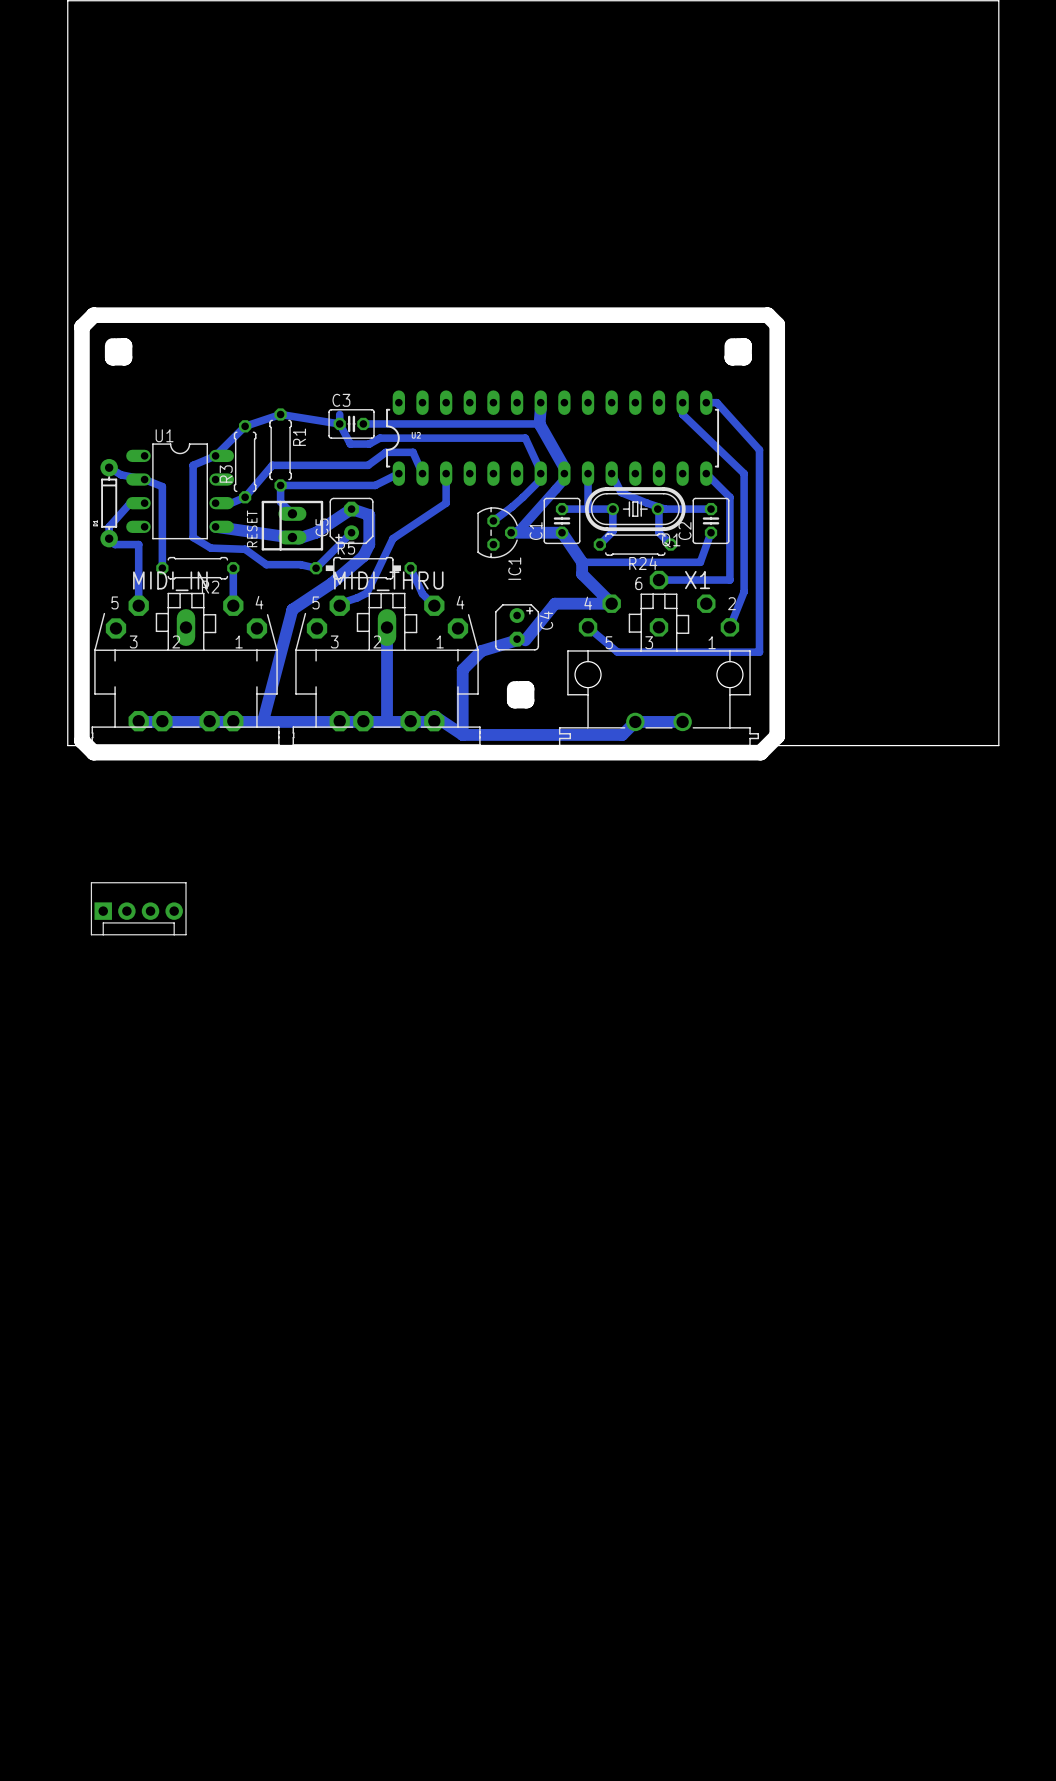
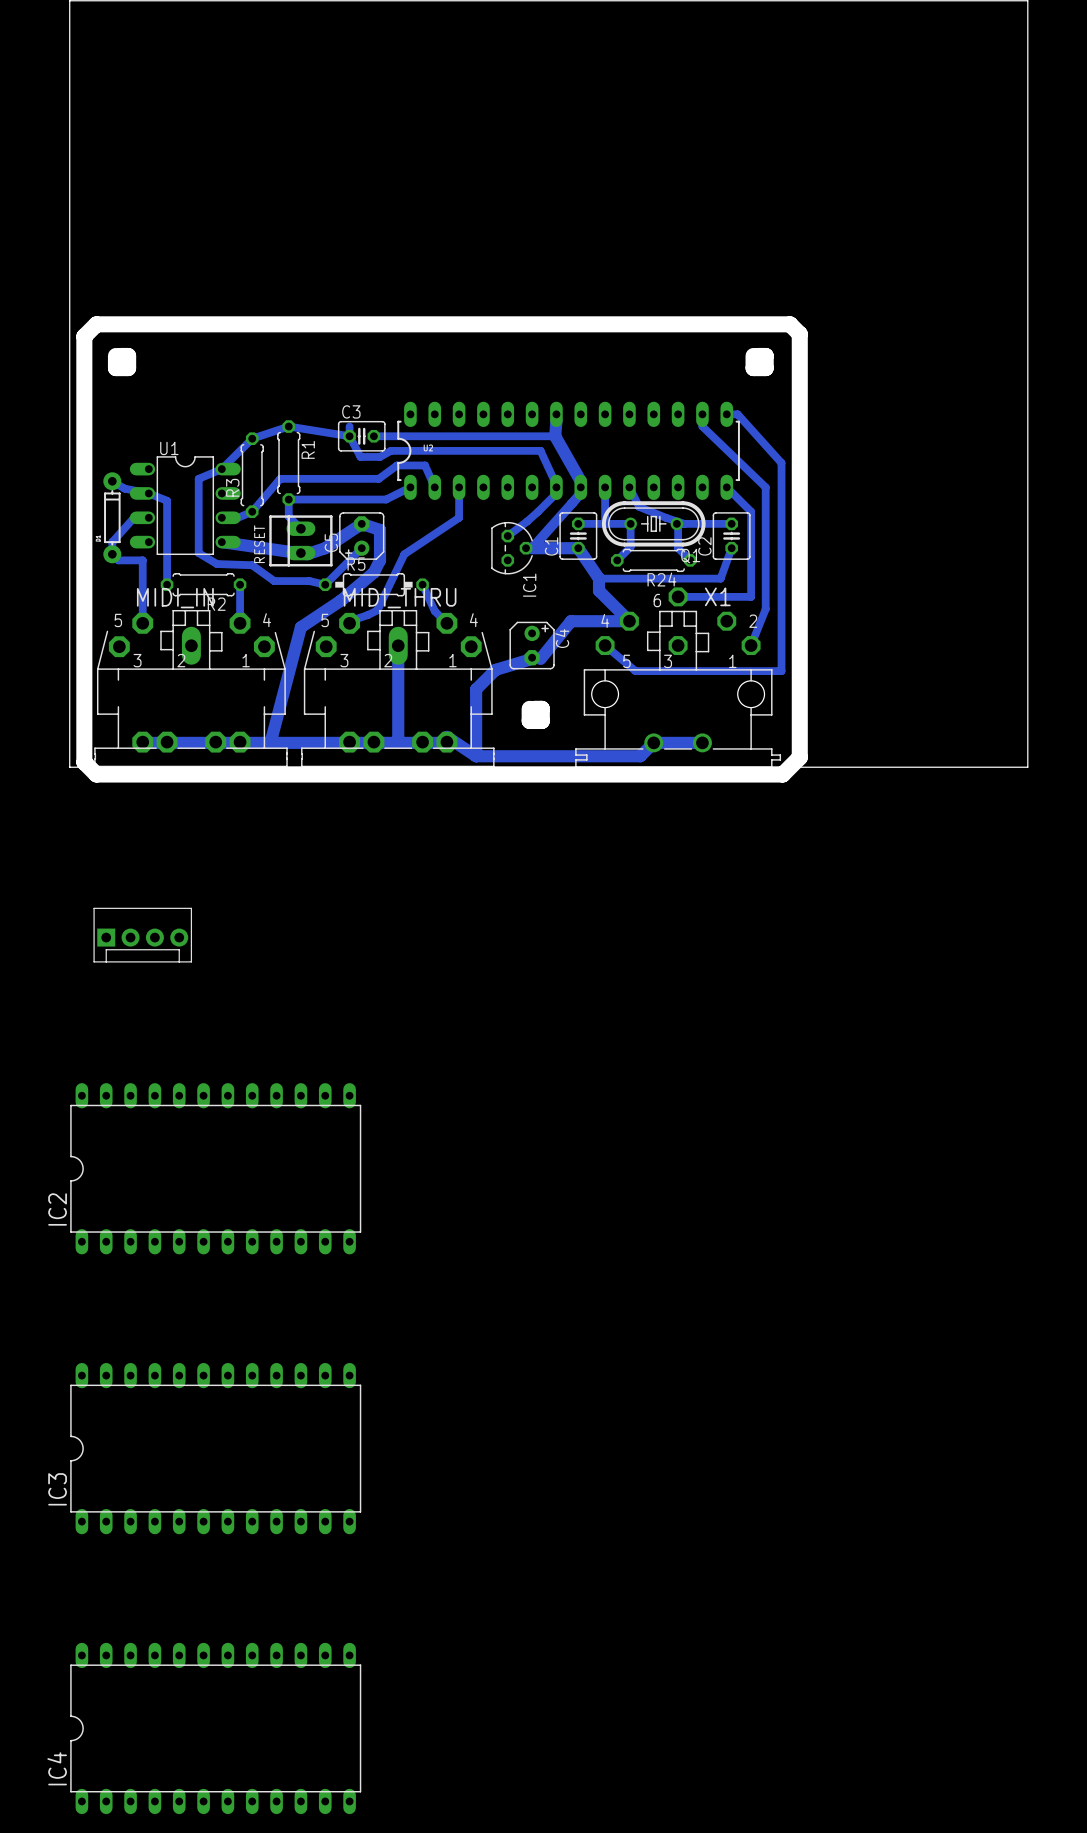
IC2: none -> (215, 1168)
IC3: none -> (215, 1448)
IC4: none -> (215, 1728)

